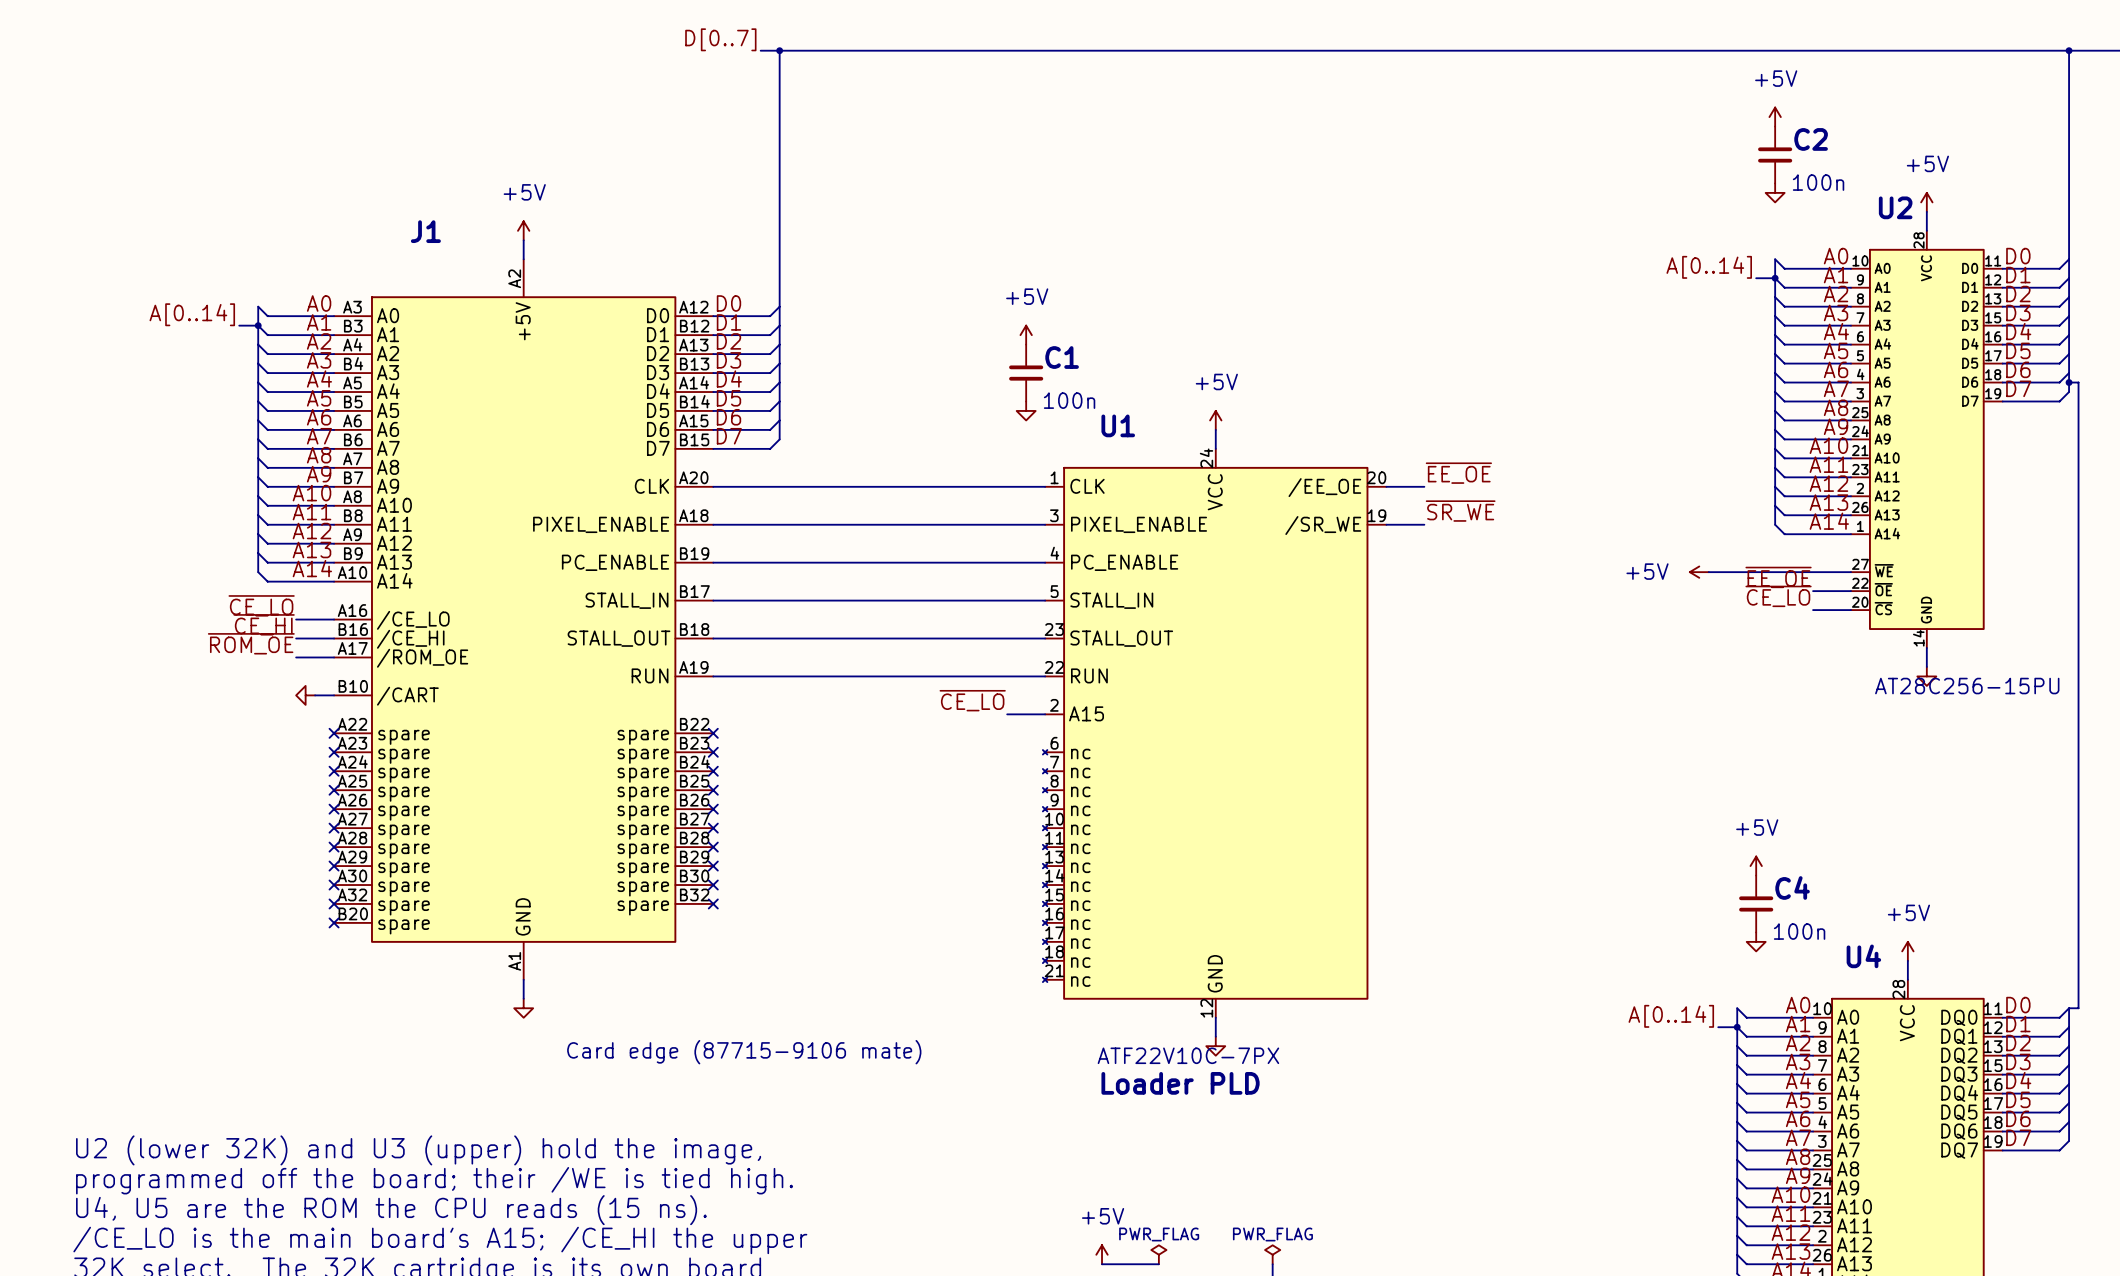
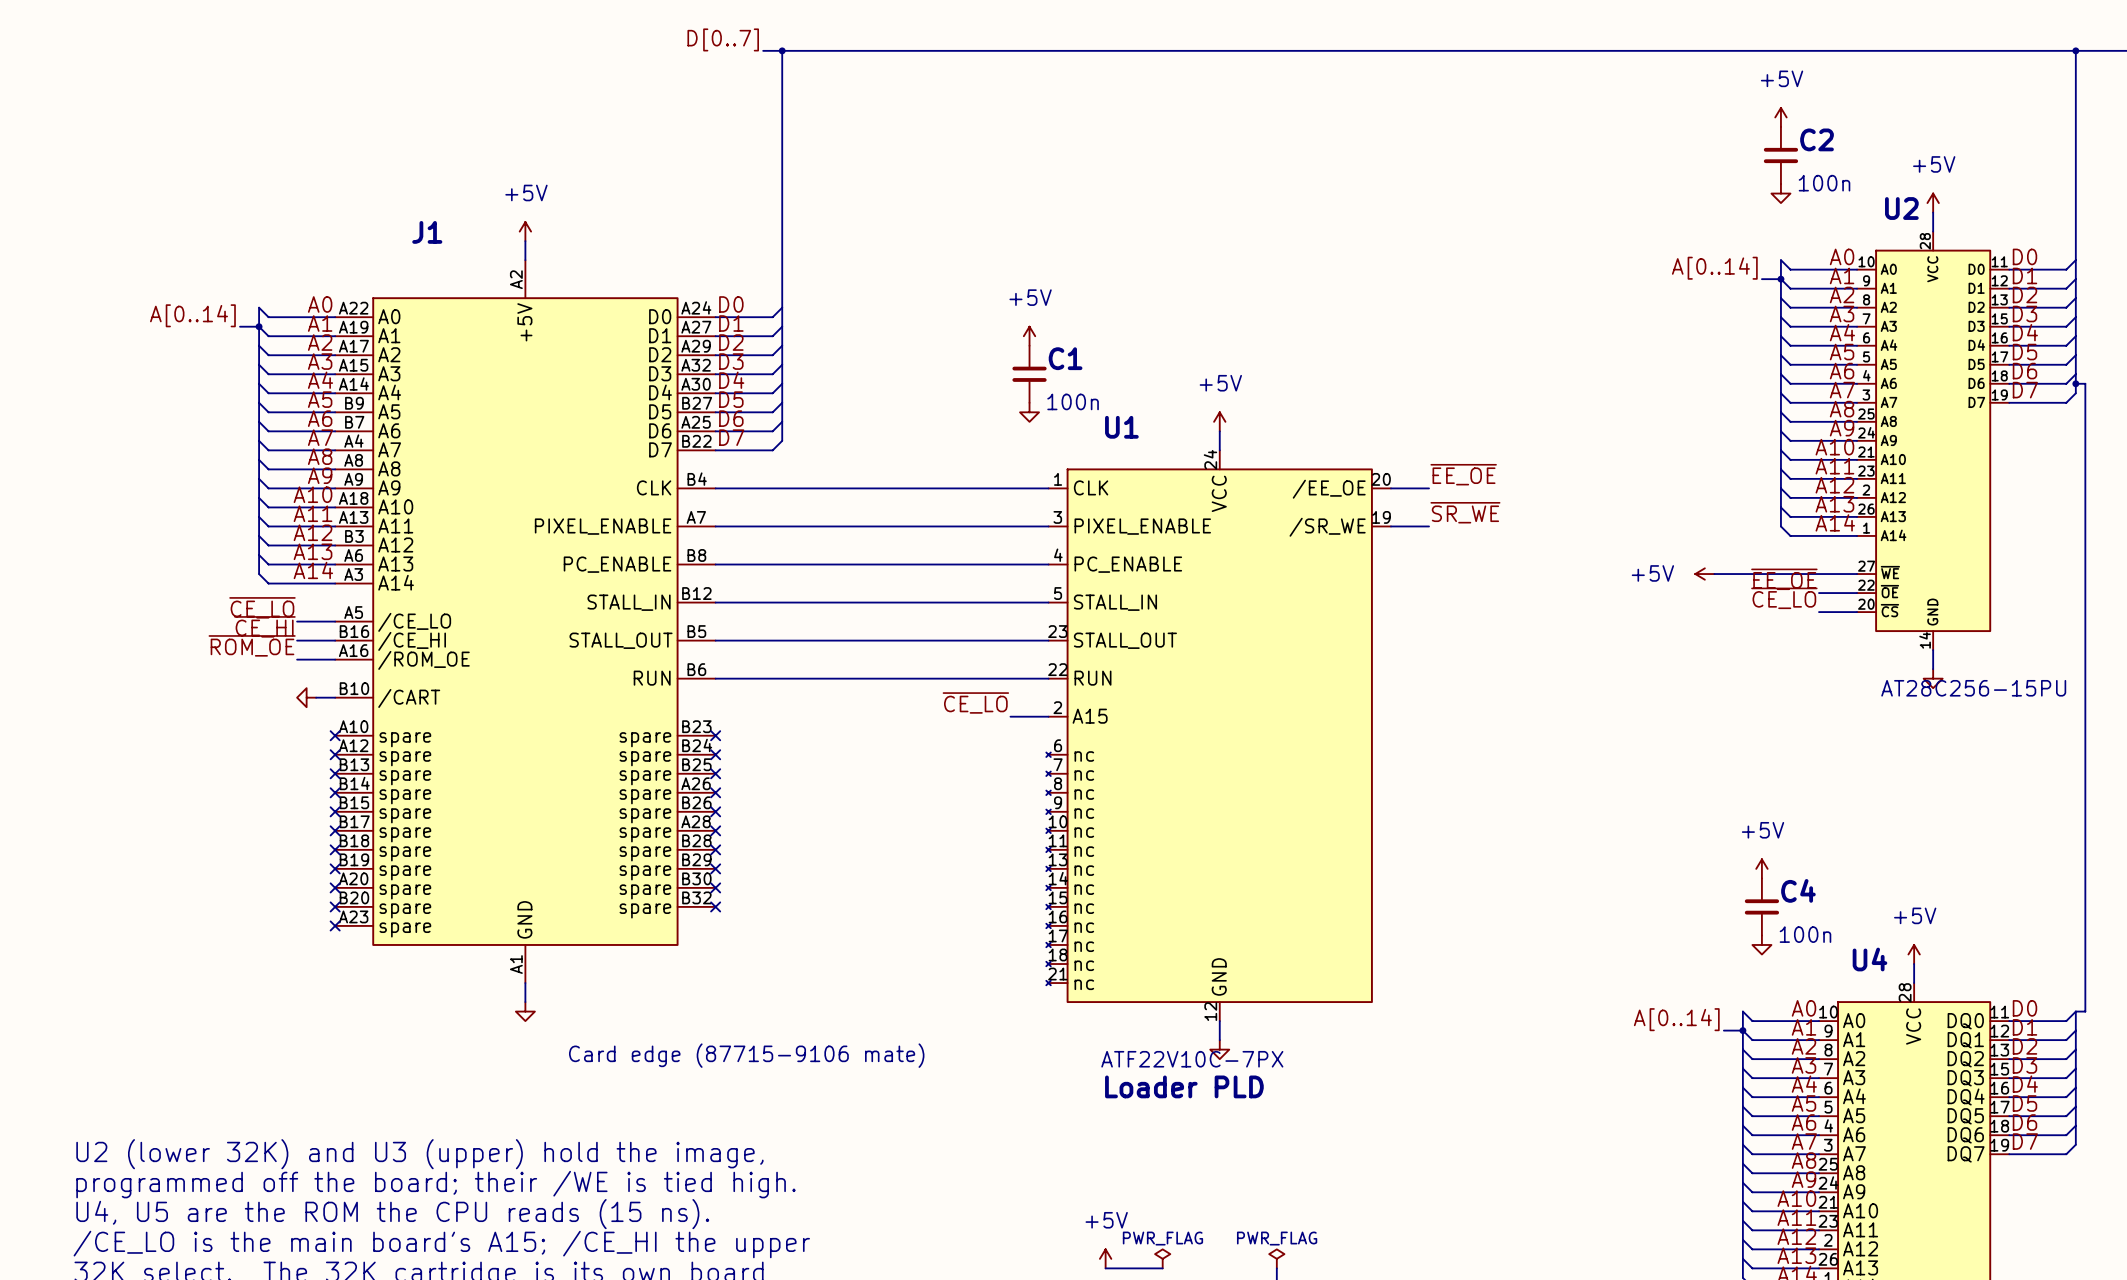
J1 symbol: [334, 259, 714, 980] -> [335, 260, 716, 984]

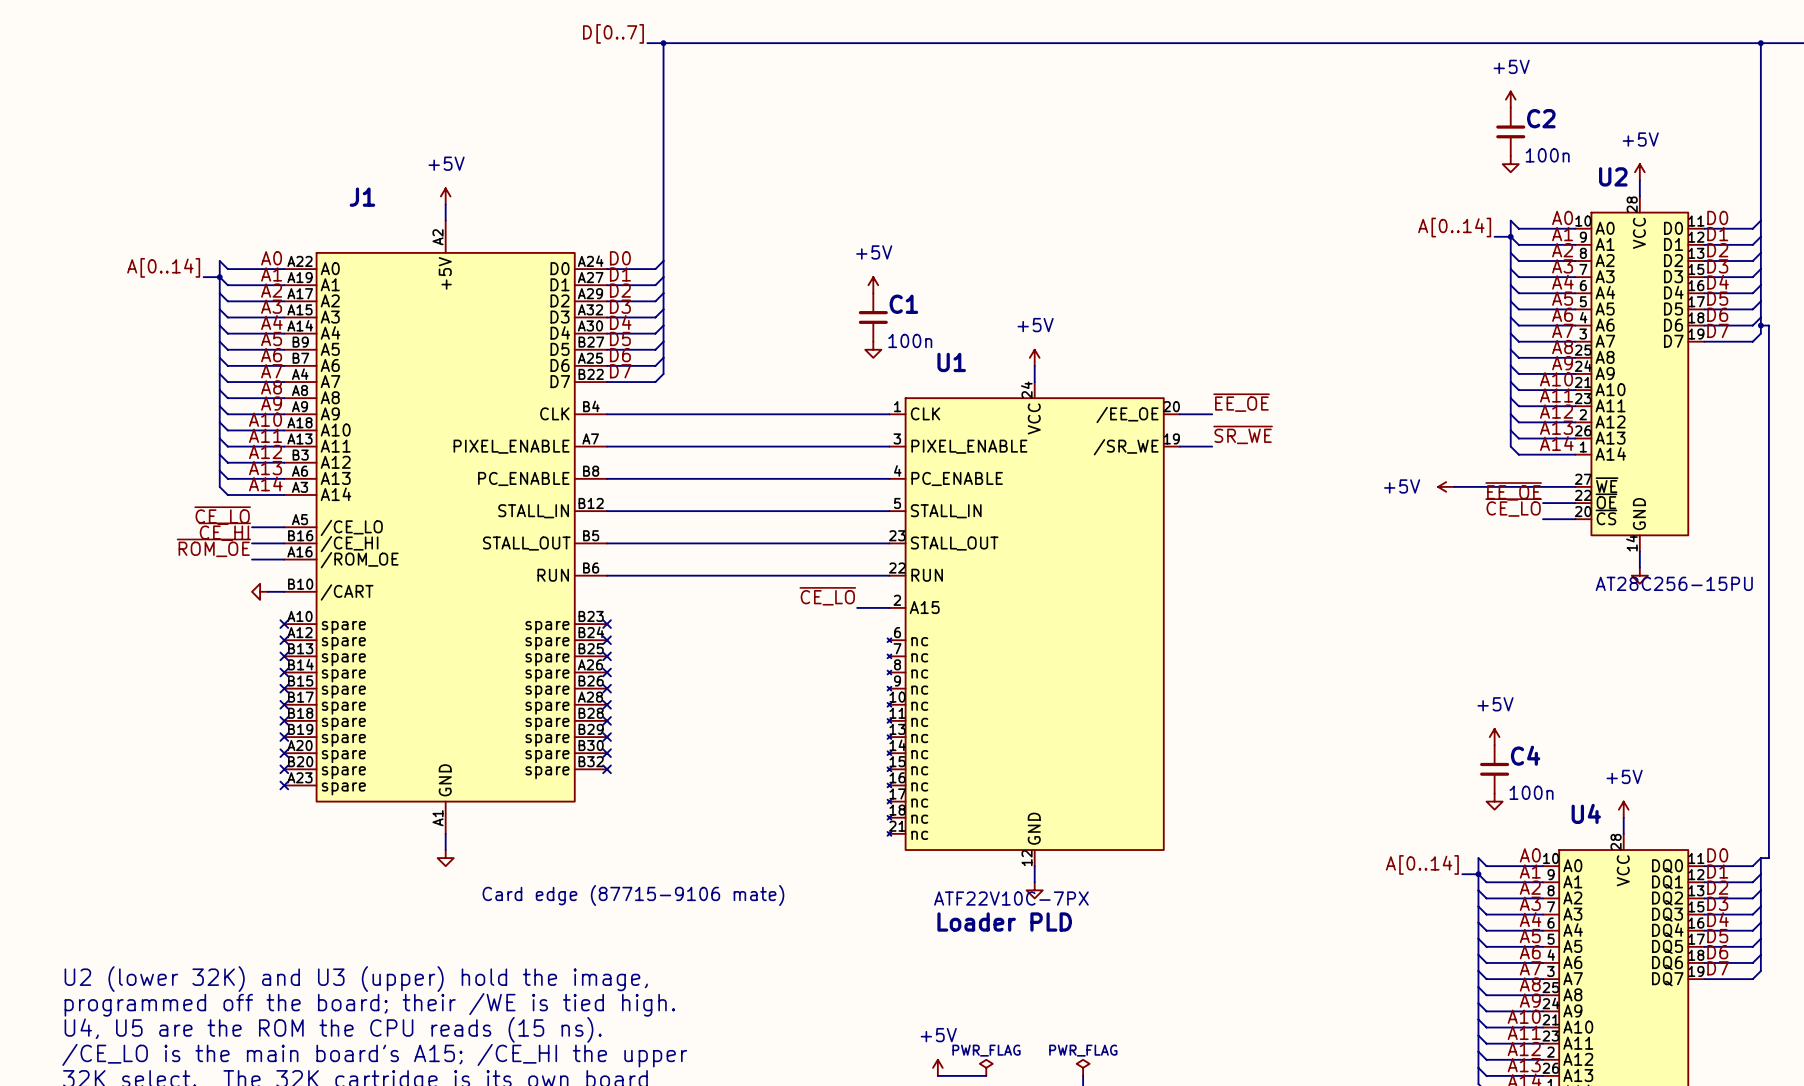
U2 symbol: [1857, 231, 2010, 651] -> [1575, 196, 1705, 552]

